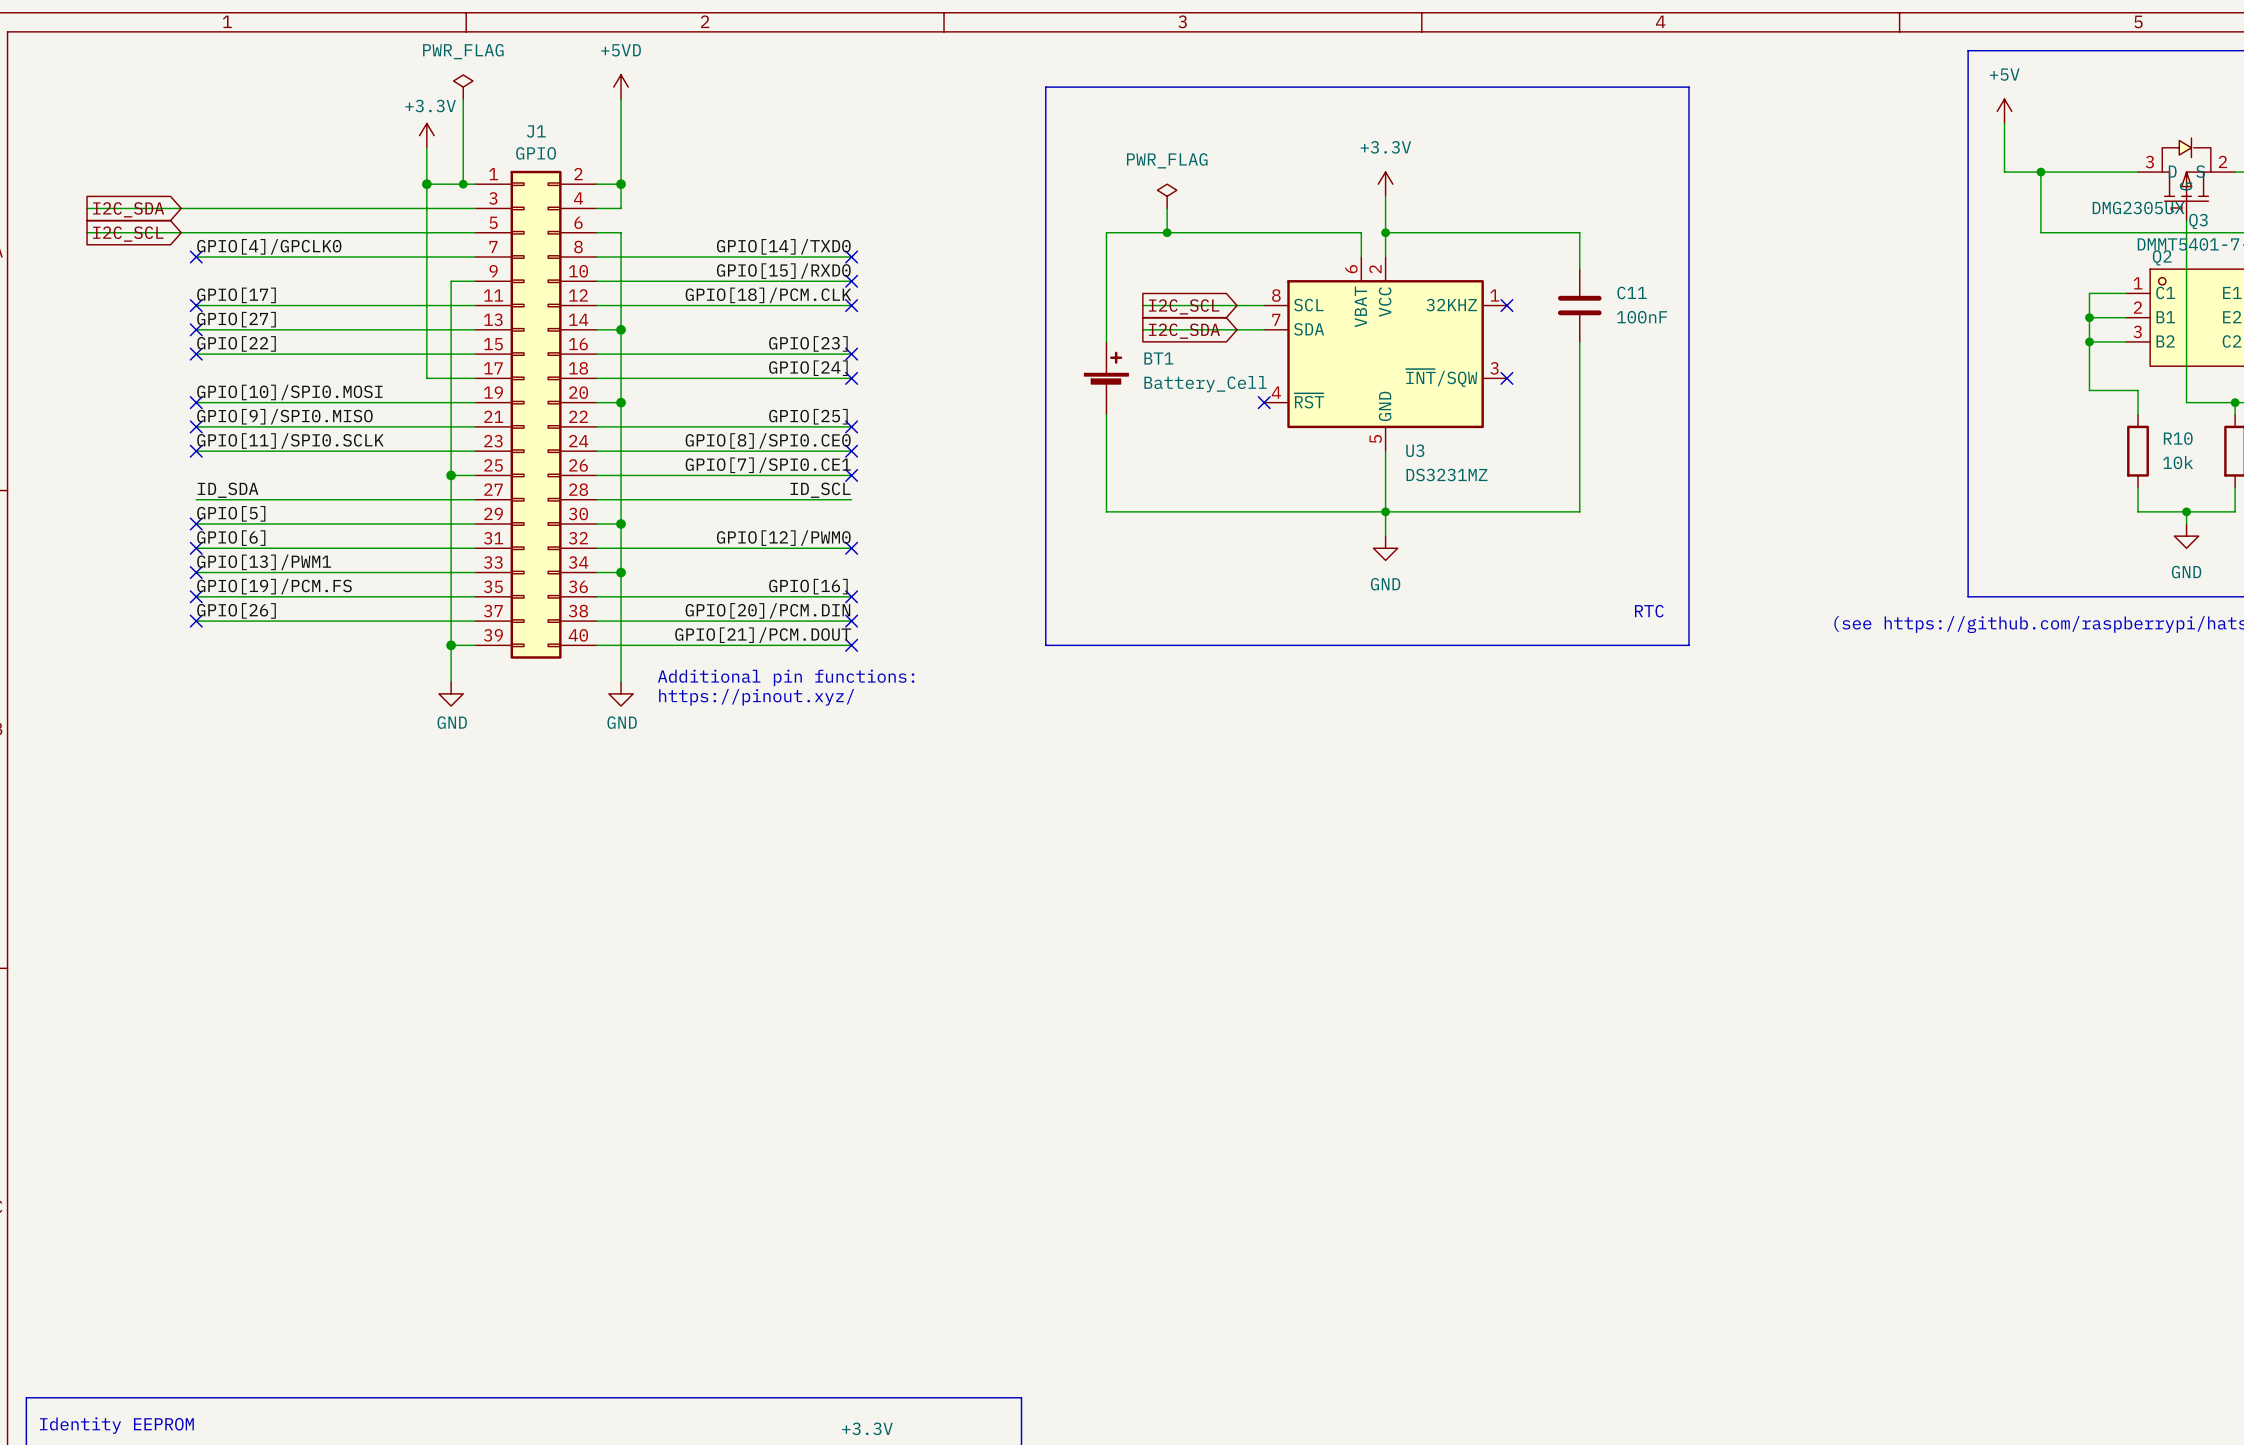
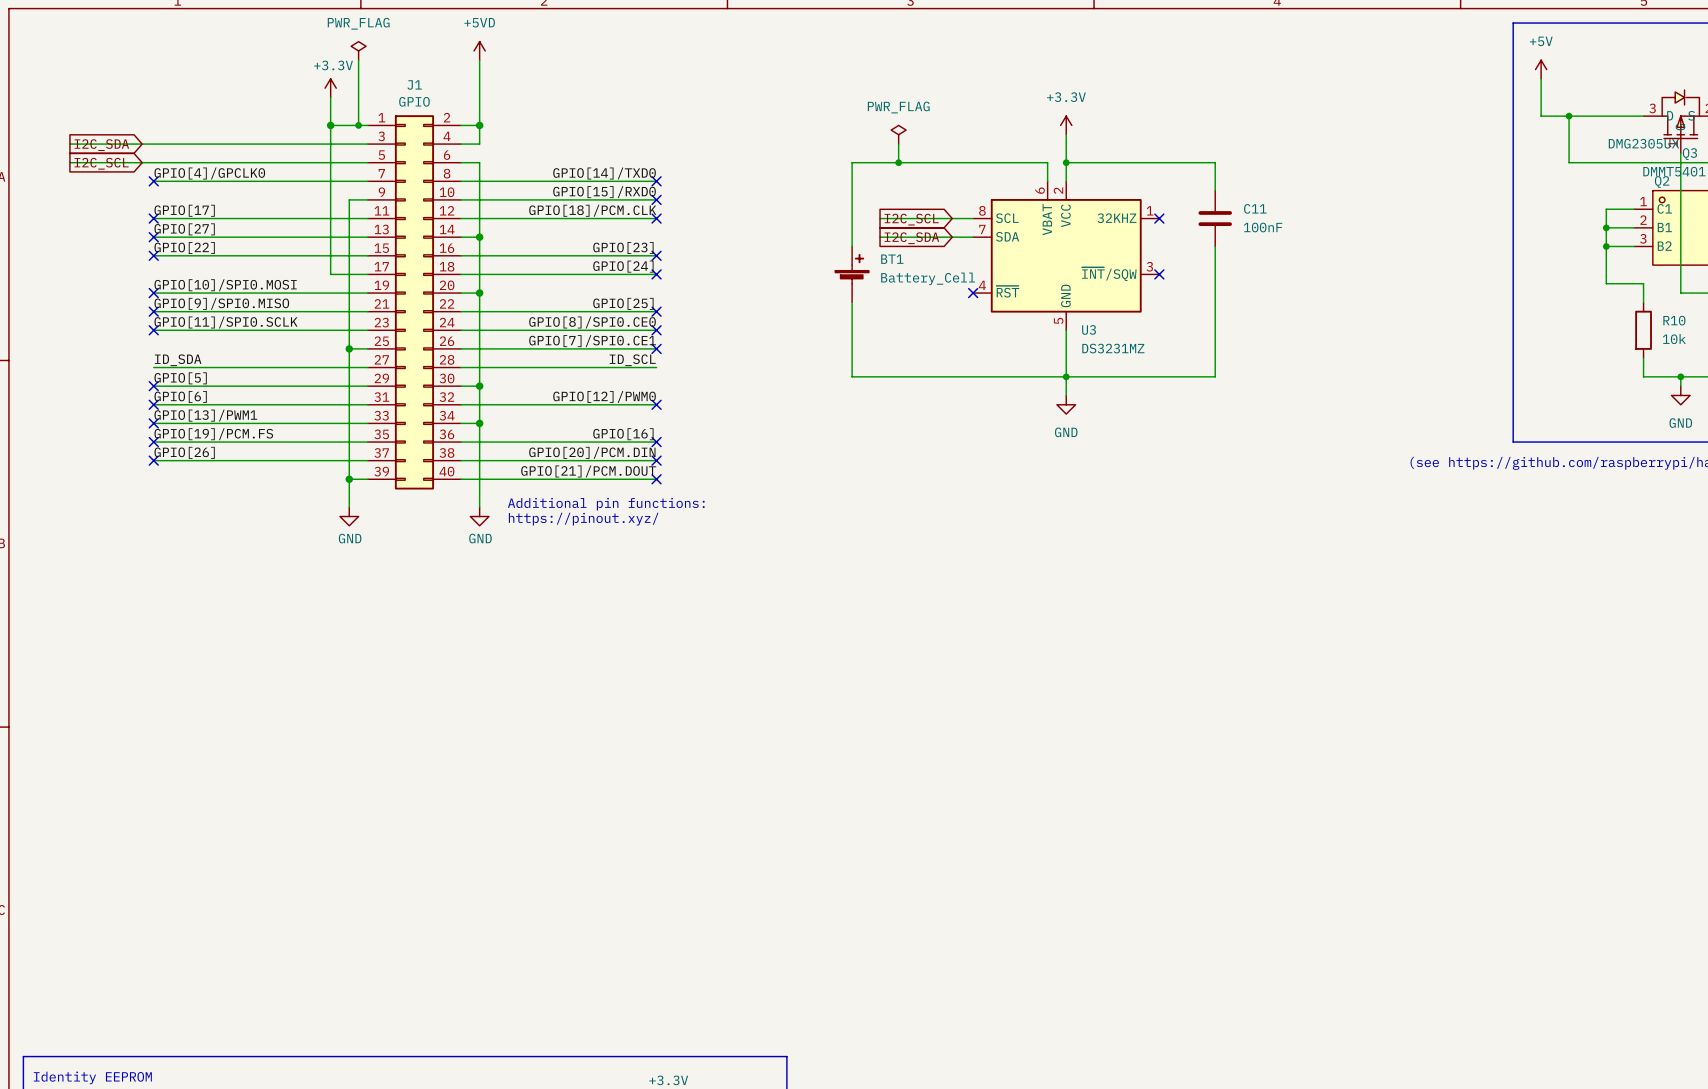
line: (1045, 87) (1045, 645) (1688, 645) (1688, 87) (1045, 87) -> none
text: RTC (1649, 611) -> none

